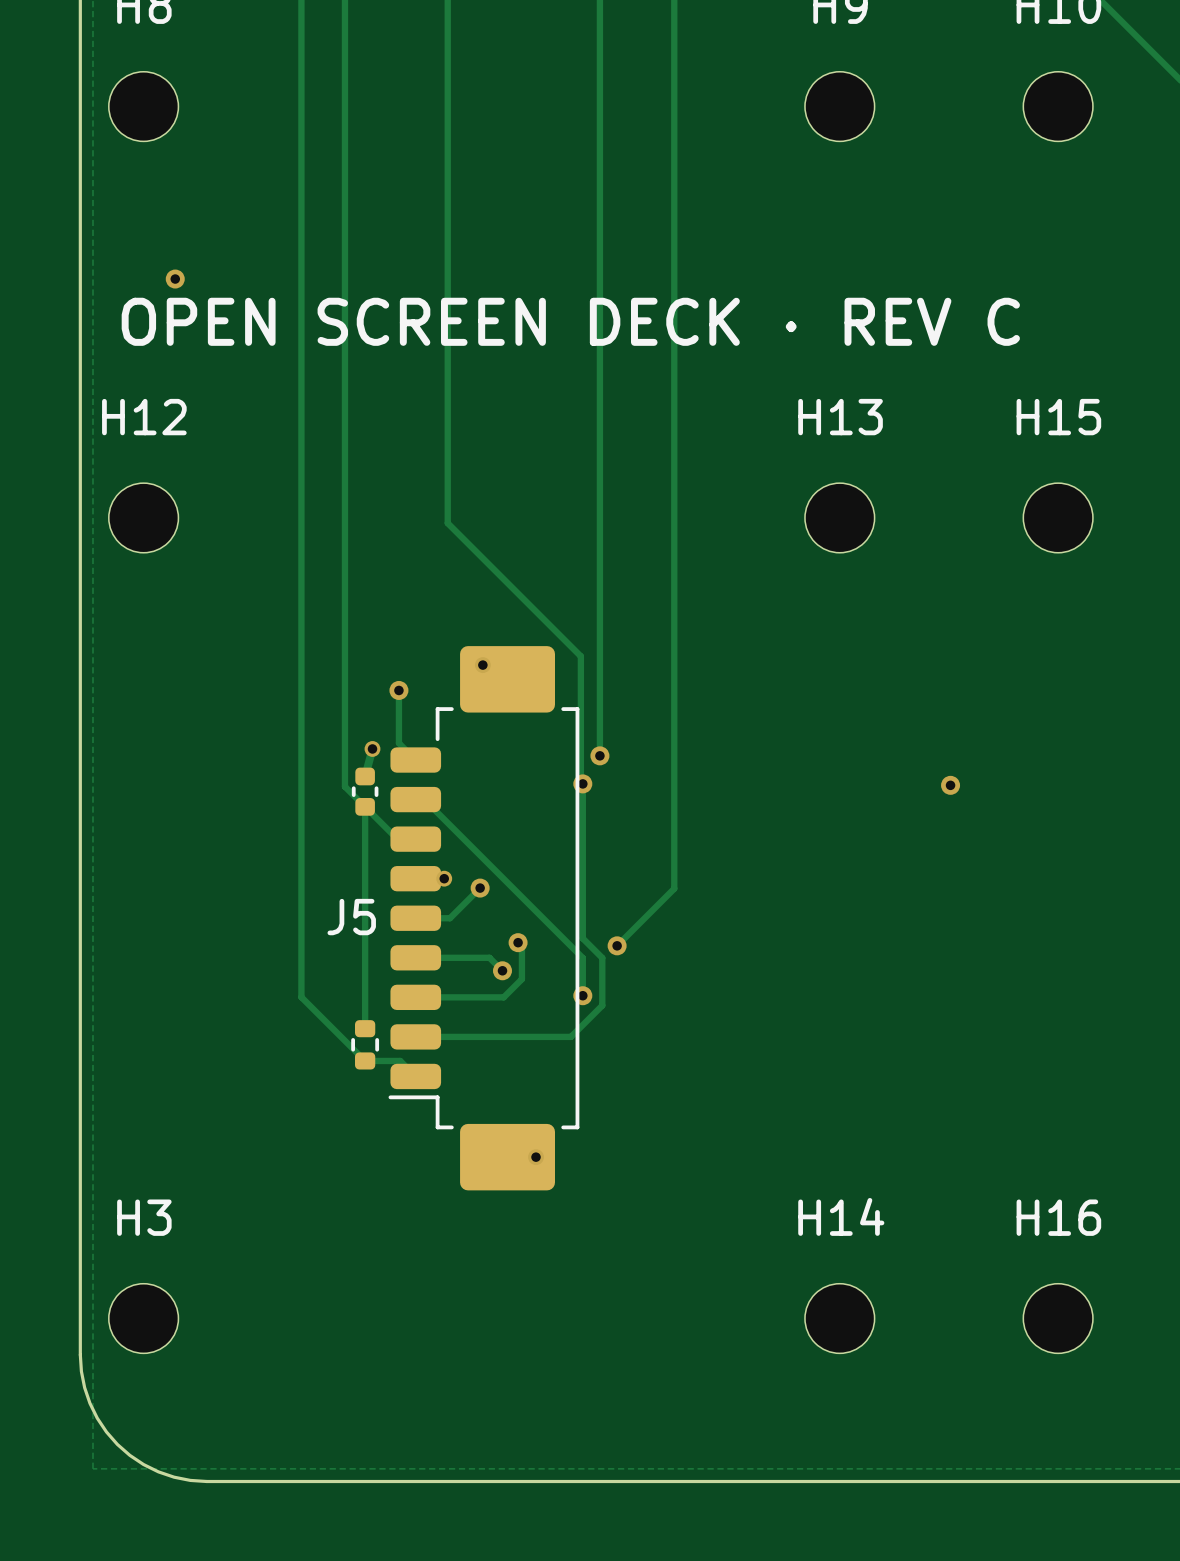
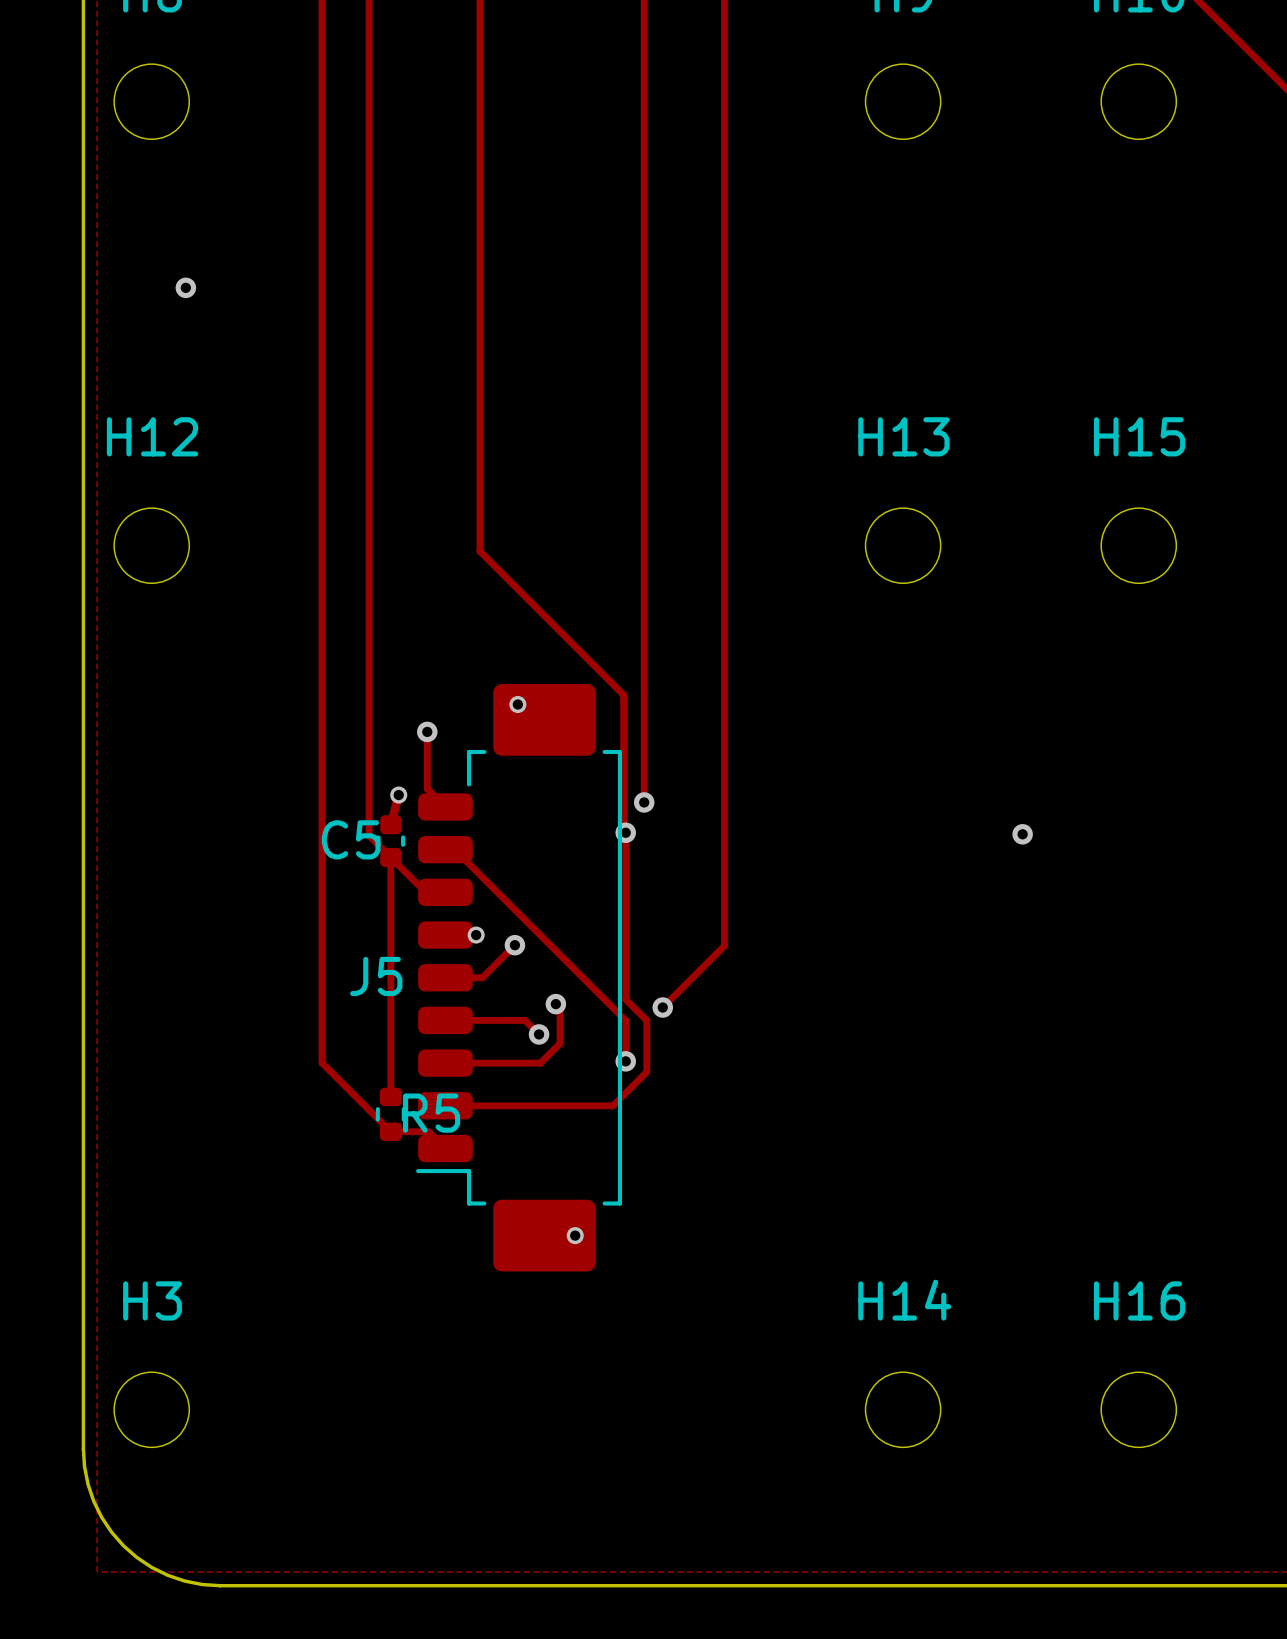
text: OPEN SCREEN DECK · REV C (570, 321) -> none
C5 name: none -> C5 (351, 839)
R5 name: none -> R5 (431, 1113)

